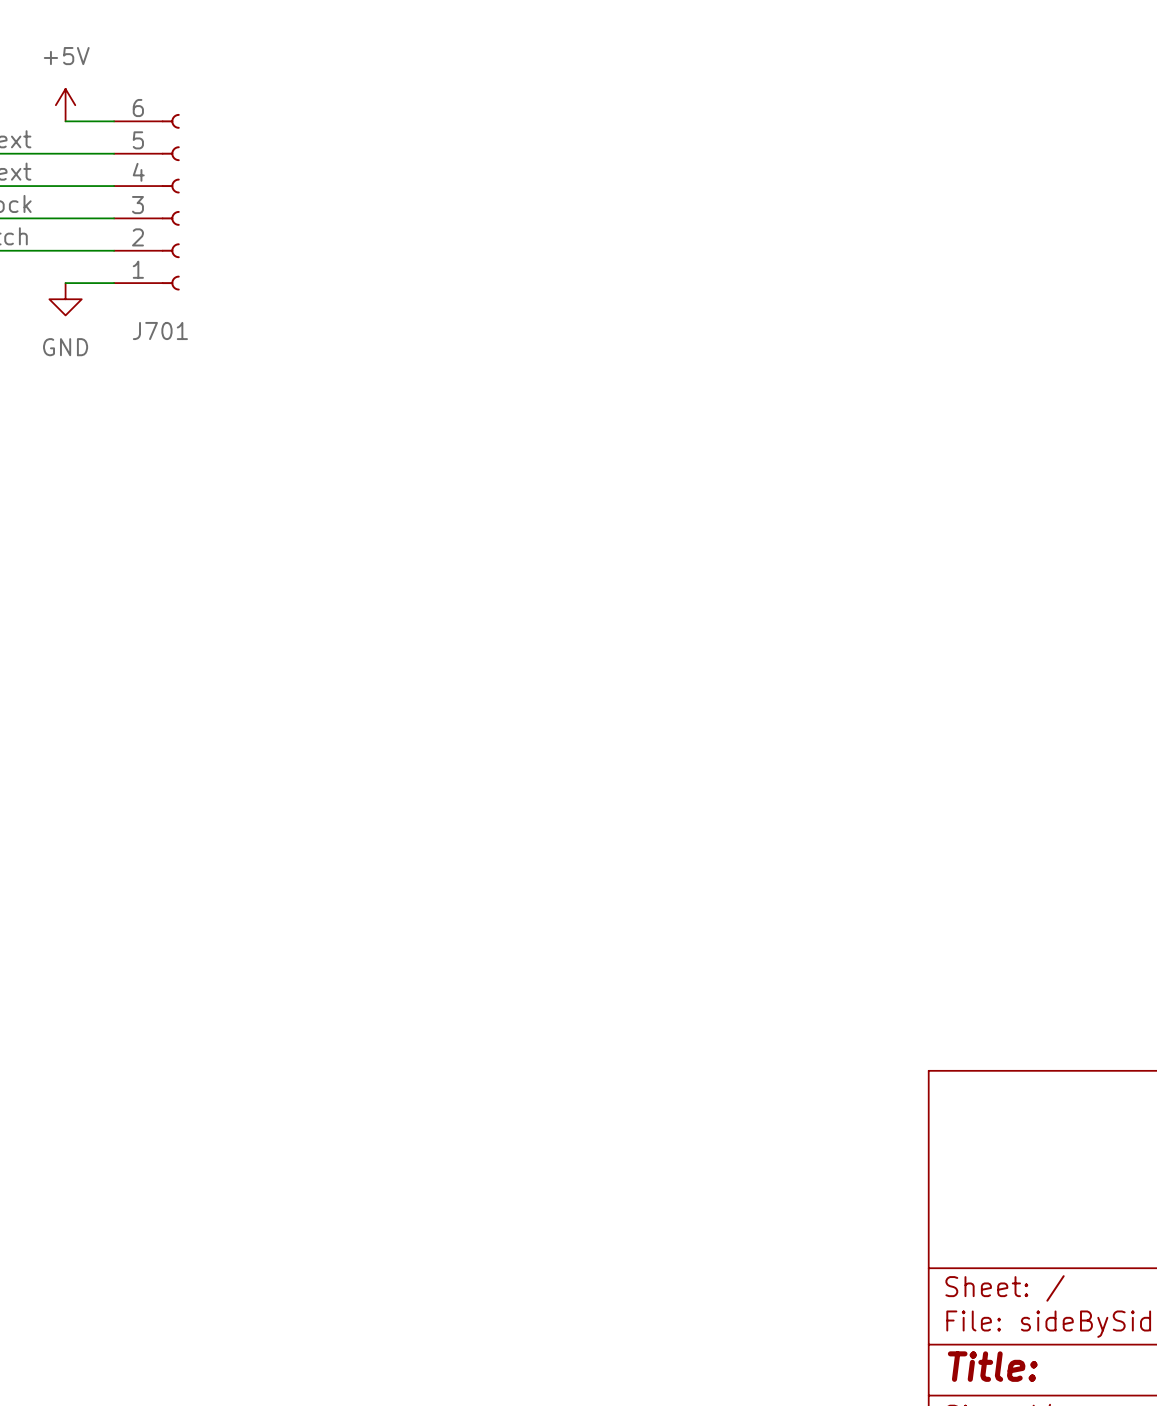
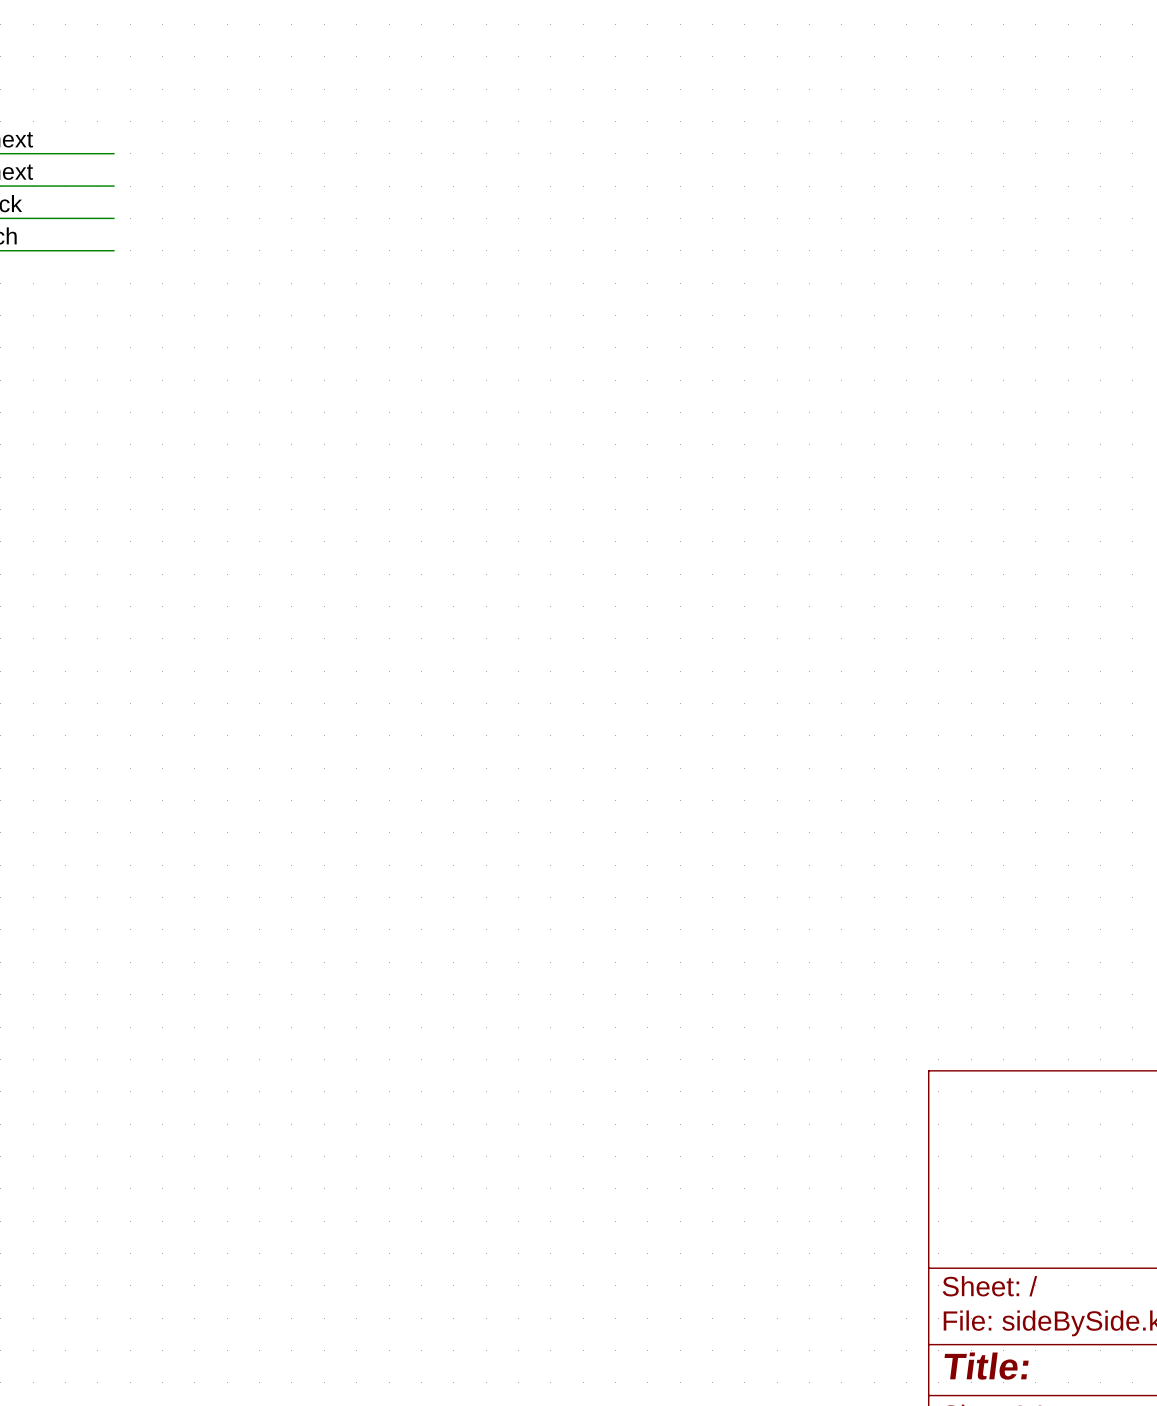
power symbol: +5V (65, 105) -> none
wire: (65, 121) (114, 121) -> none
J701: (146, 202) -> none
wire: (65, 283) (114, 283) -> none
power symbol: GND (65, 299) -> none

